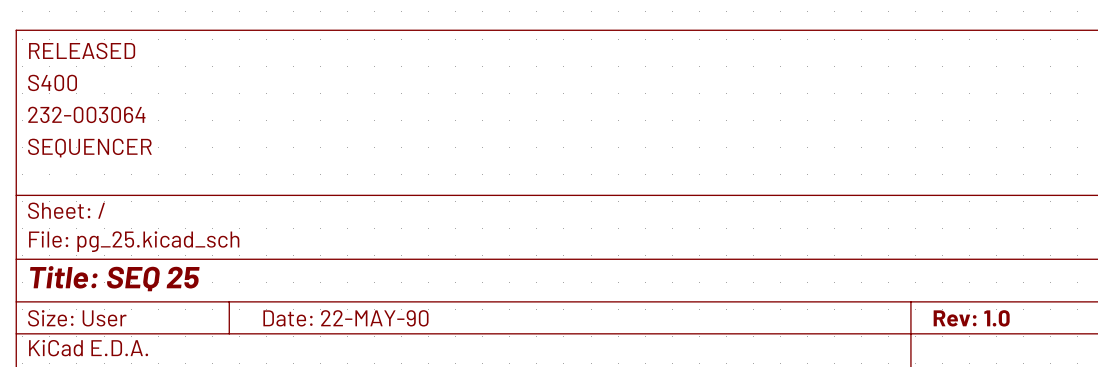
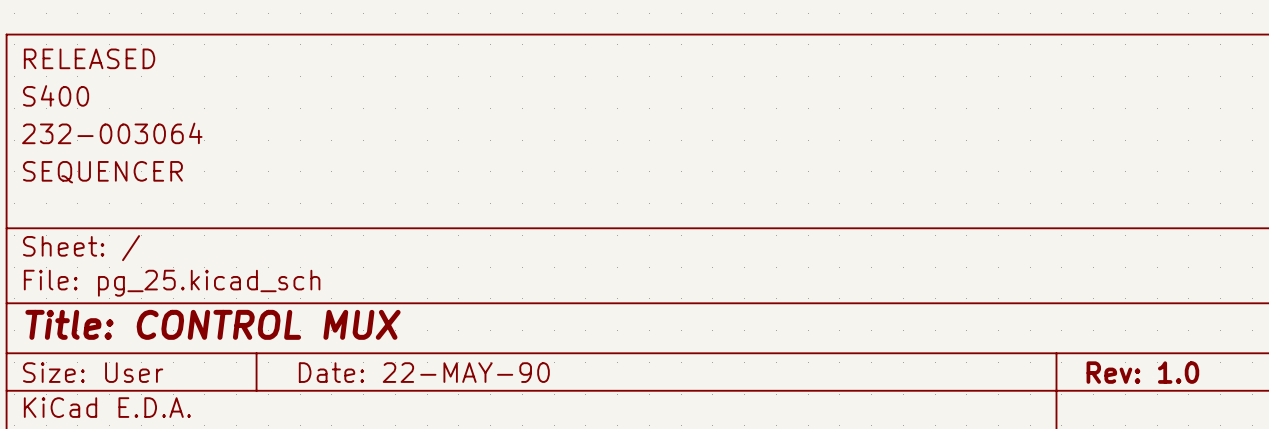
title block: Title: SEQ 25 (114, 278) -> Title: CONTROL MUX (212, 324)

